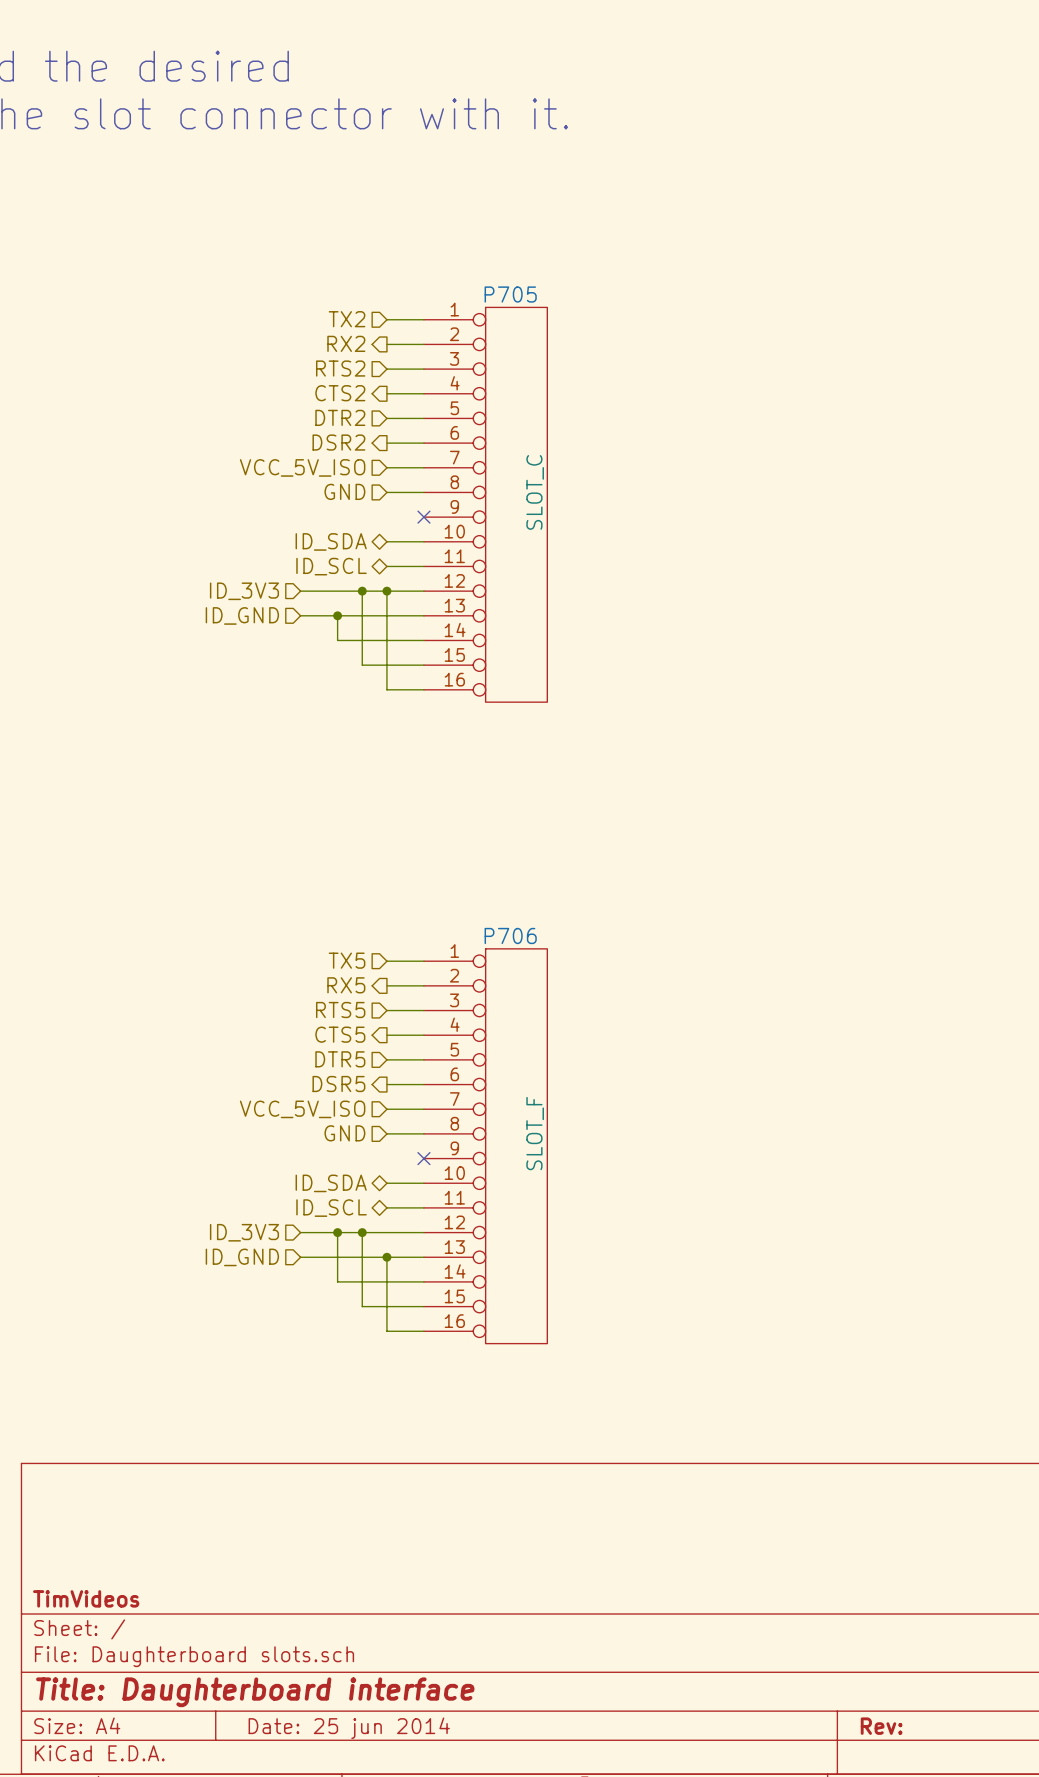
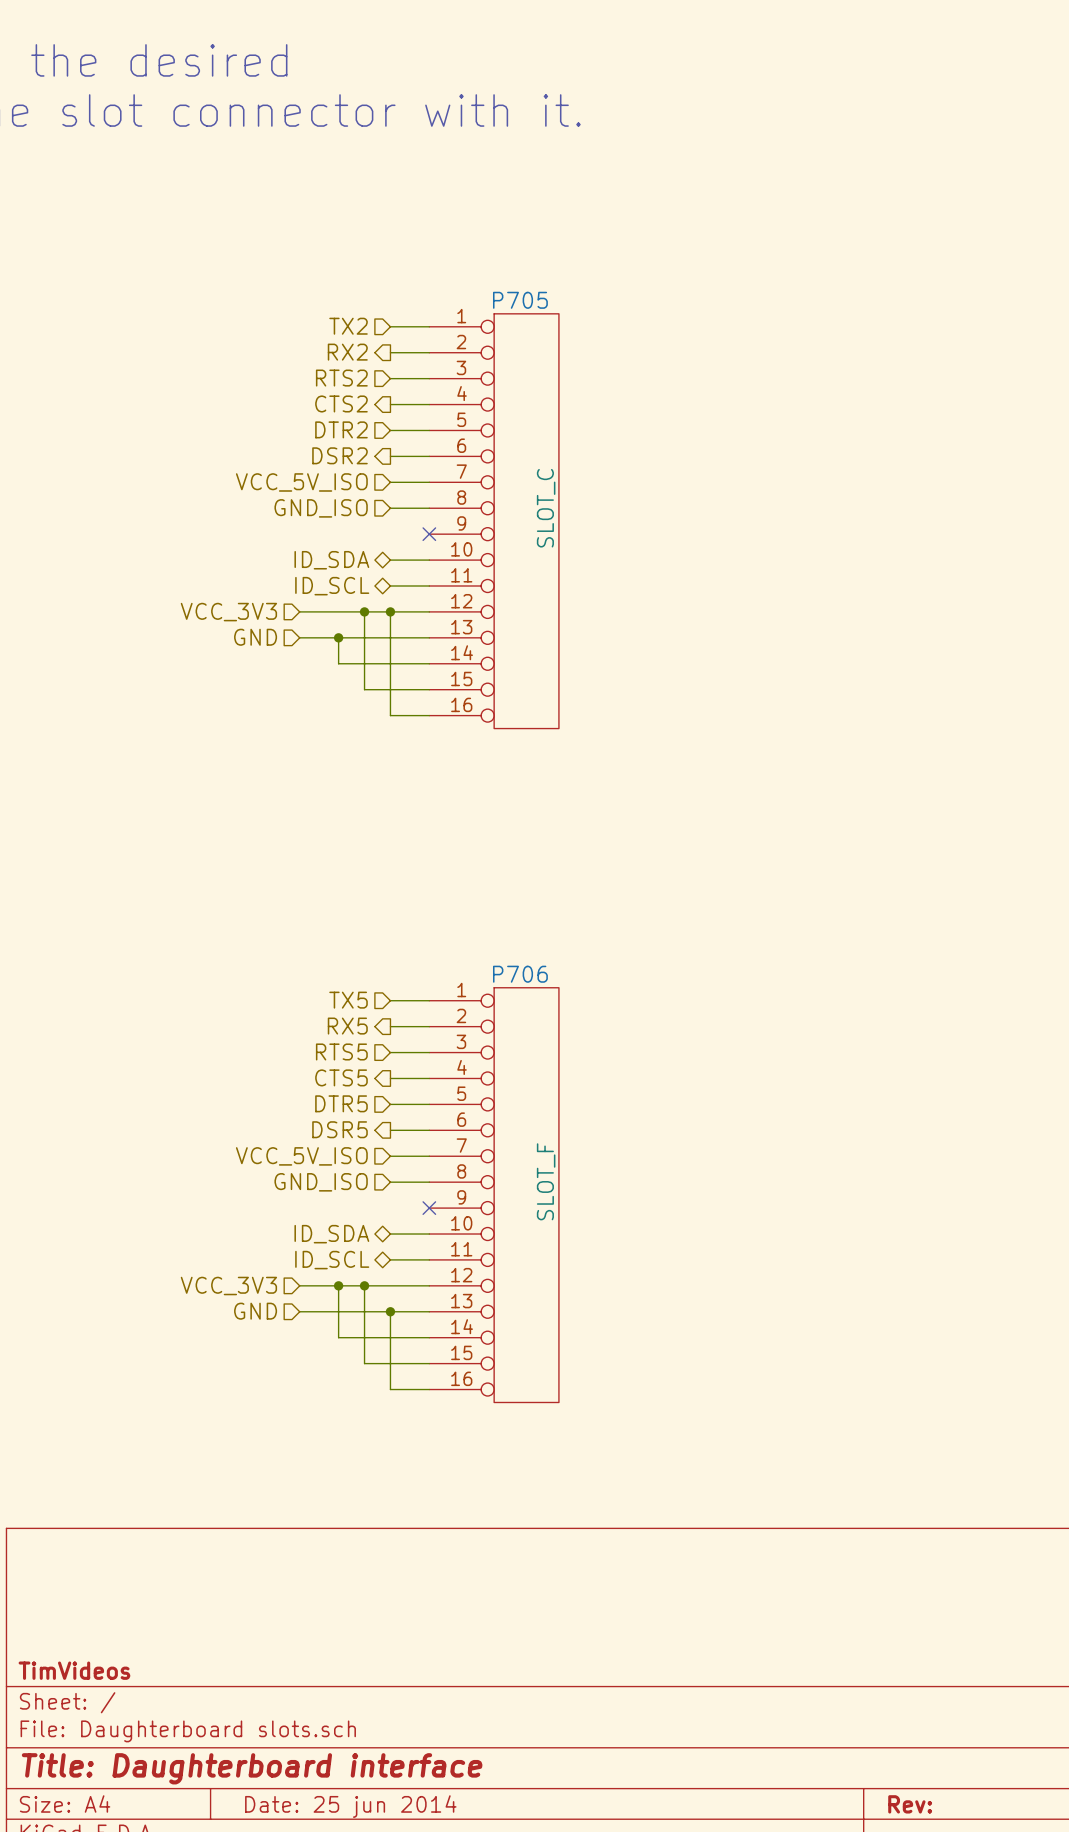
hierarchical label: GND (344, 491) -> GND_ISO (321, 508)
hierarchical label: ID_3V3 (244, 591) -> VCC_3V3 (228, 612)
hierarchical label: ID_GND (242, 615) -> GND (255, 637)
hierarchical label: GND (344, 1133) -> GND_ISO (321, 1182)
hierarchical label: ID_3V3 (244, 1232) -> VCC_3V3 (228, 1286)
hierarchical label: ID_GND (242, 1257) -> GND (255, 1311)

